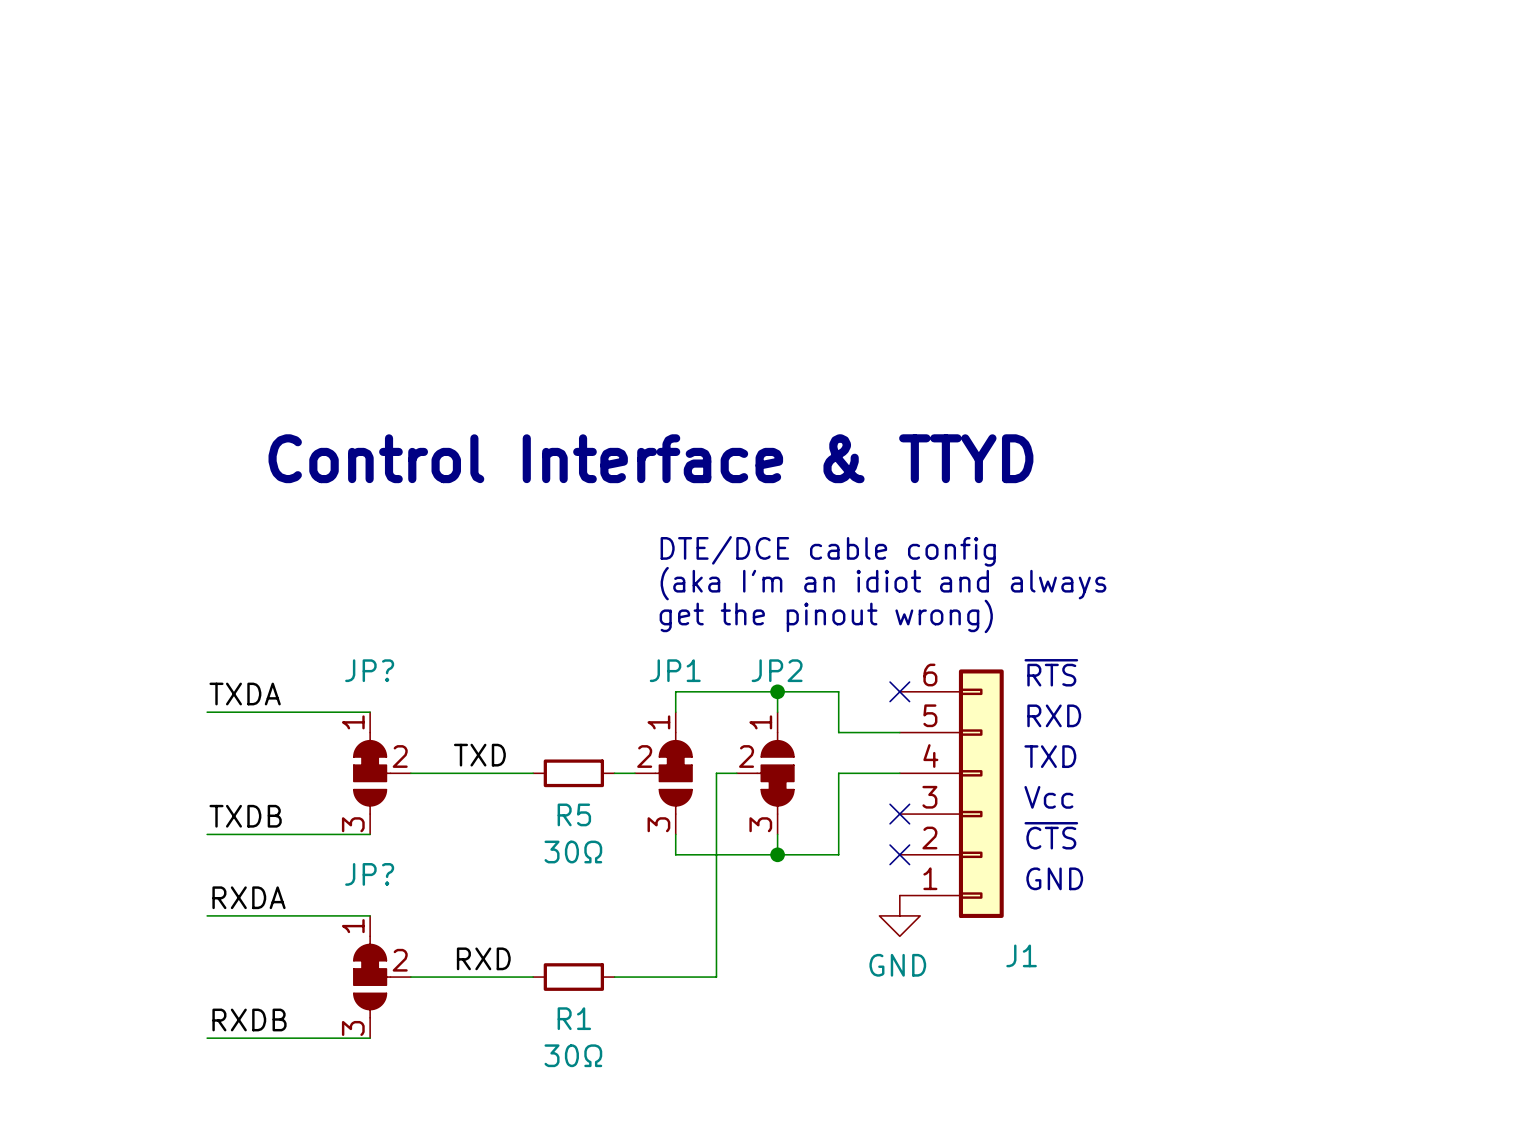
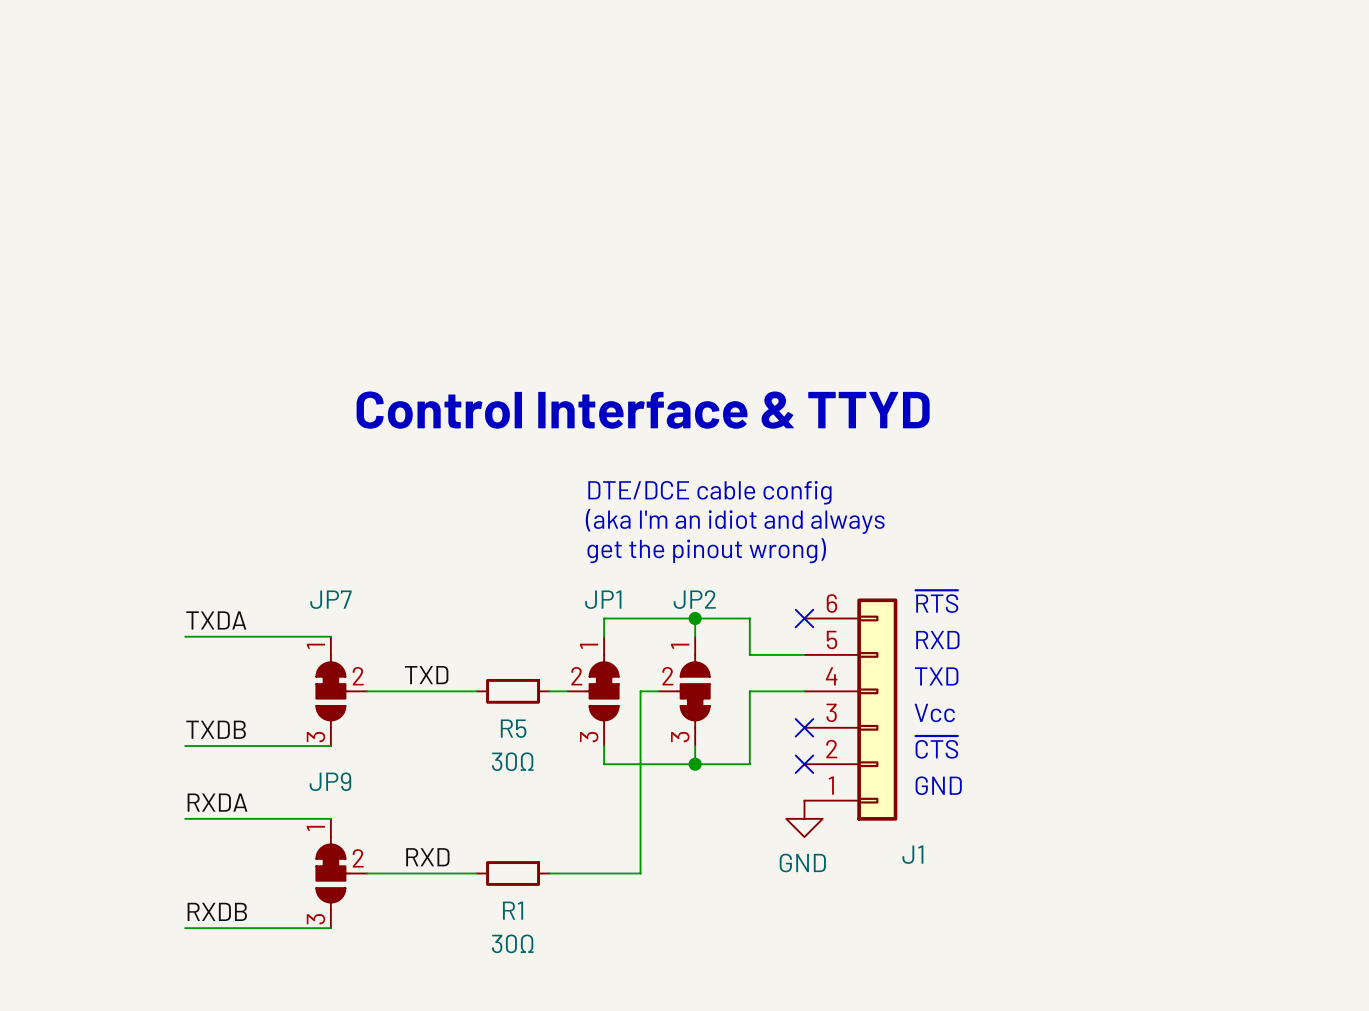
JP? name: JP? (369, 670) -> JP7 (330, 599)
JP? name: JP? (369, 874) -> JP9 (330, 781)

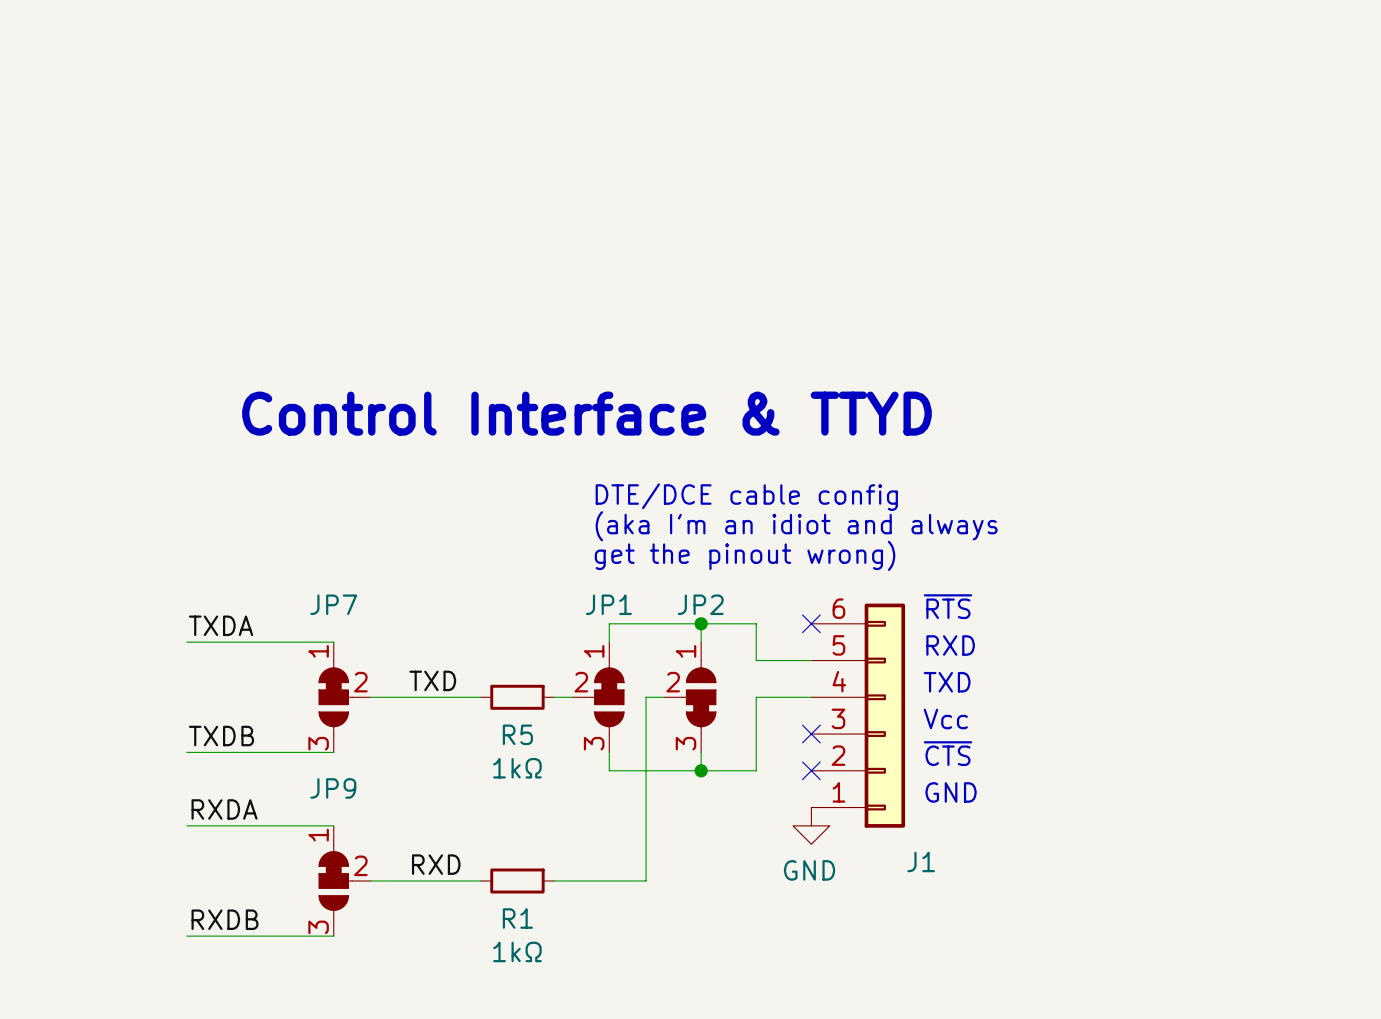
R5 value: 30Ω (512, 761) -> 1kΩ (517, 768)
R1 value: 30Ω (512, 943) -> 1kΩ (517, 951)

